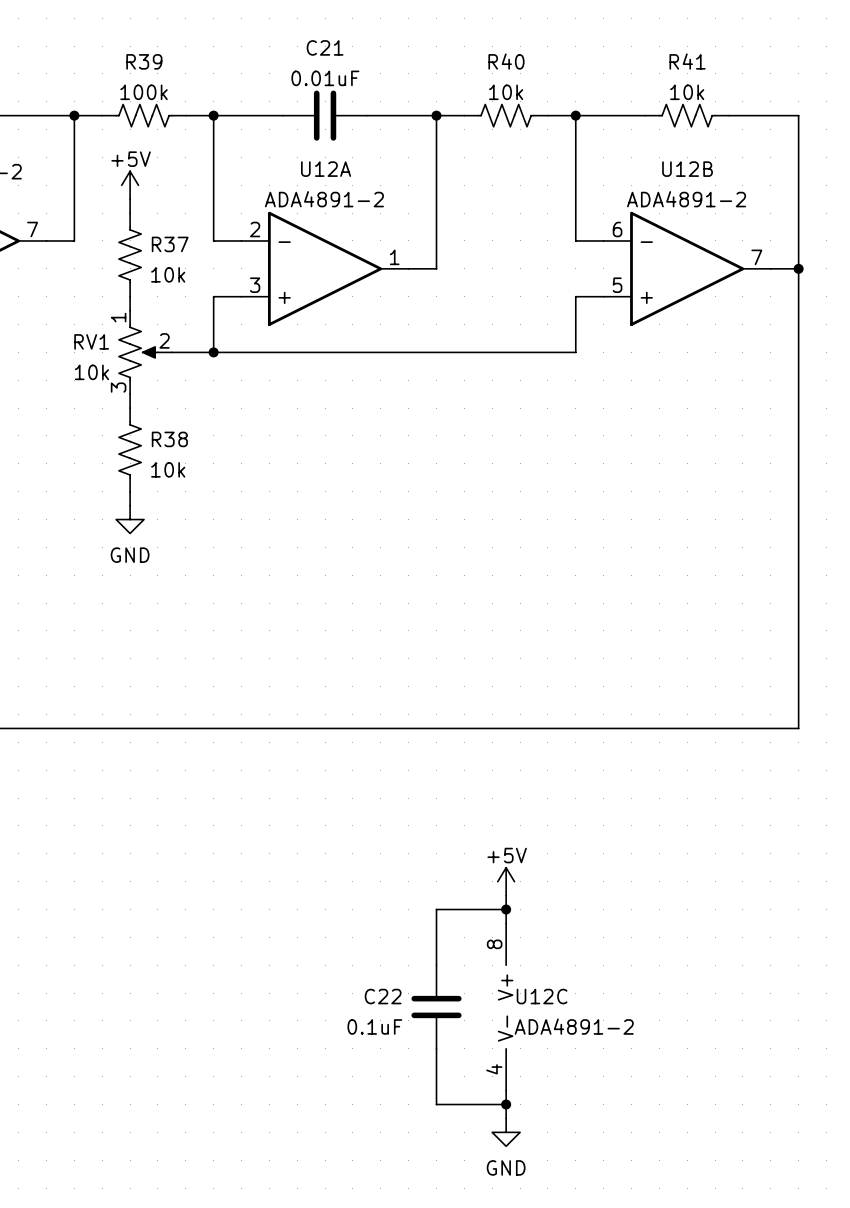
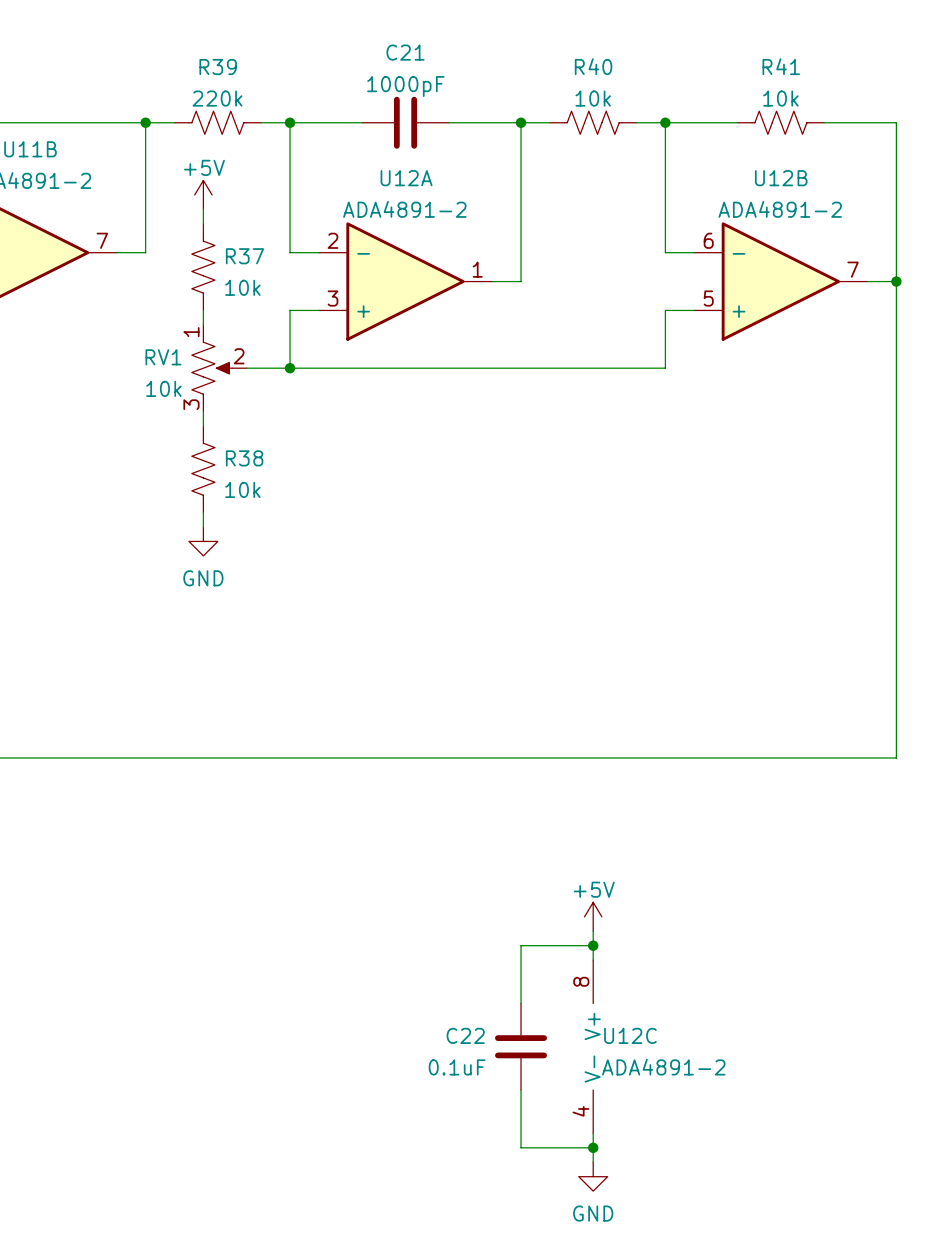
C21 value: 0.01uF (325, 78) -> 1000pF (405, 86)
R39 value: 100k (144, 92) -> 220k (217, 98)

